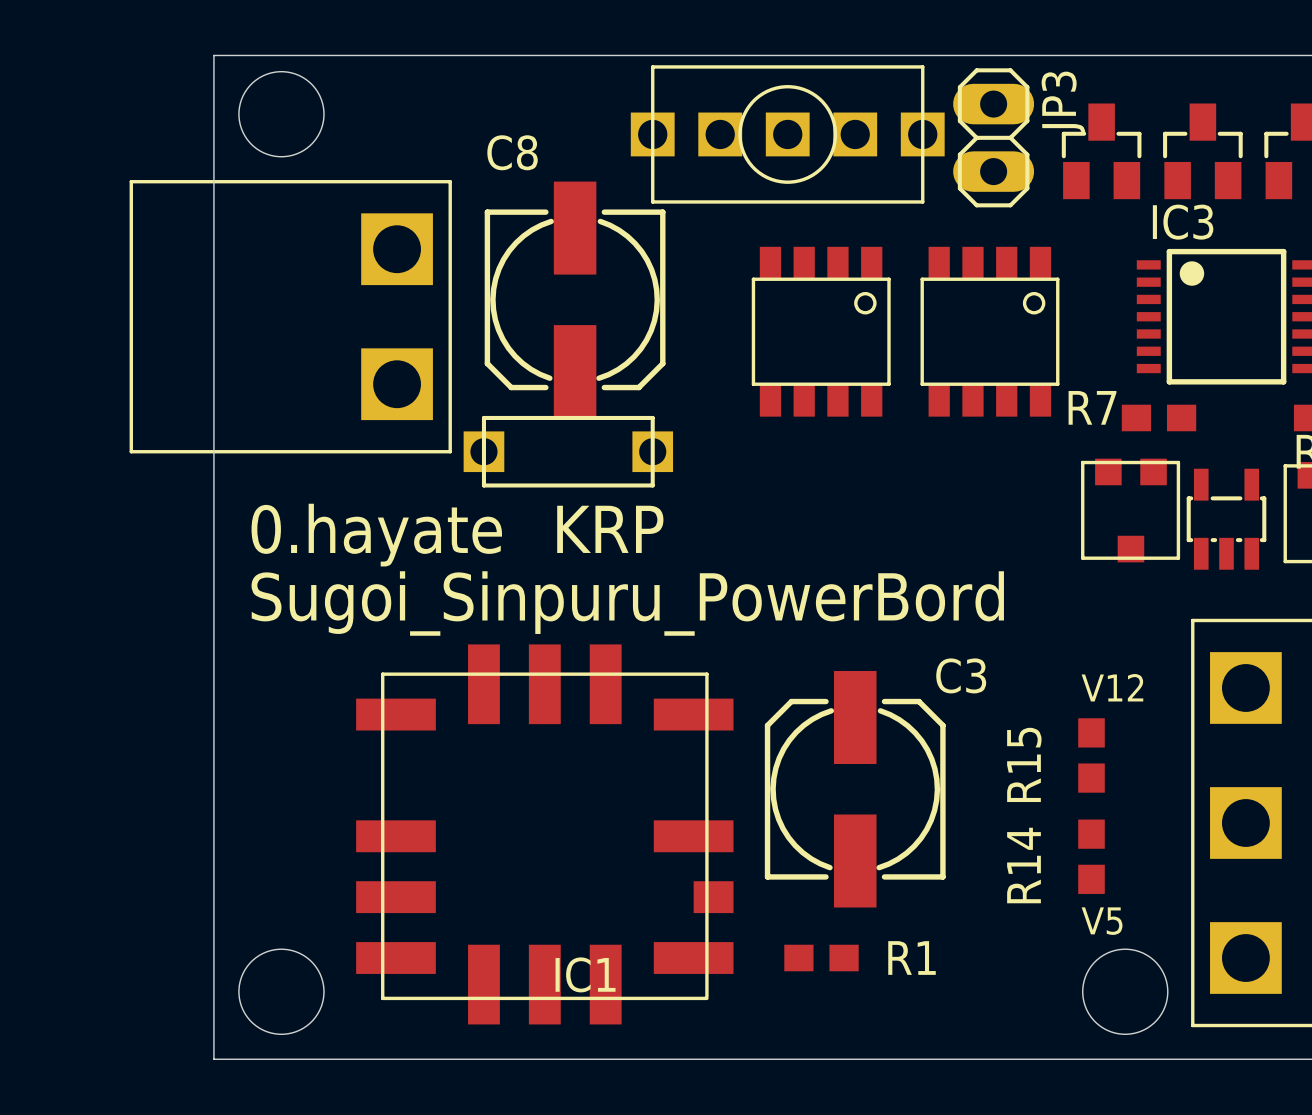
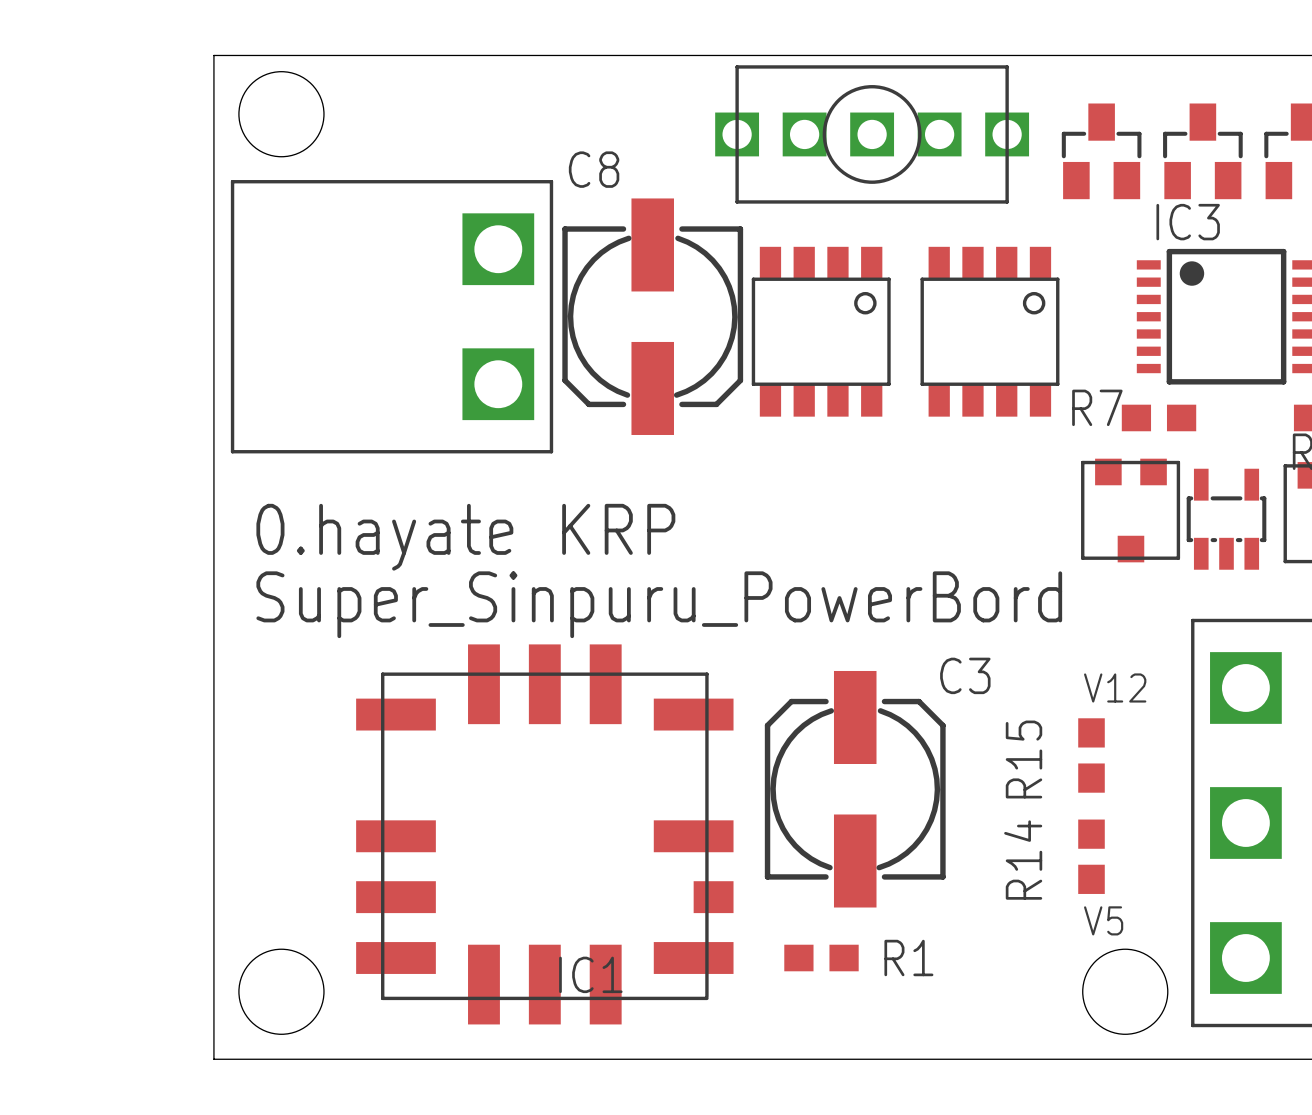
part position: (787, 134) -> (872, 134)
JP3: (993, 137) -> none
C8 position: (575, 299) -> (652, 316)
part position: (290, 316) -> (392, 316)
part: (568, 451) -> none
text: Sugoi_Sinpuru_PowerBord (627, 603) -> Super_Sinpuru_PowerBord (659, 604)

